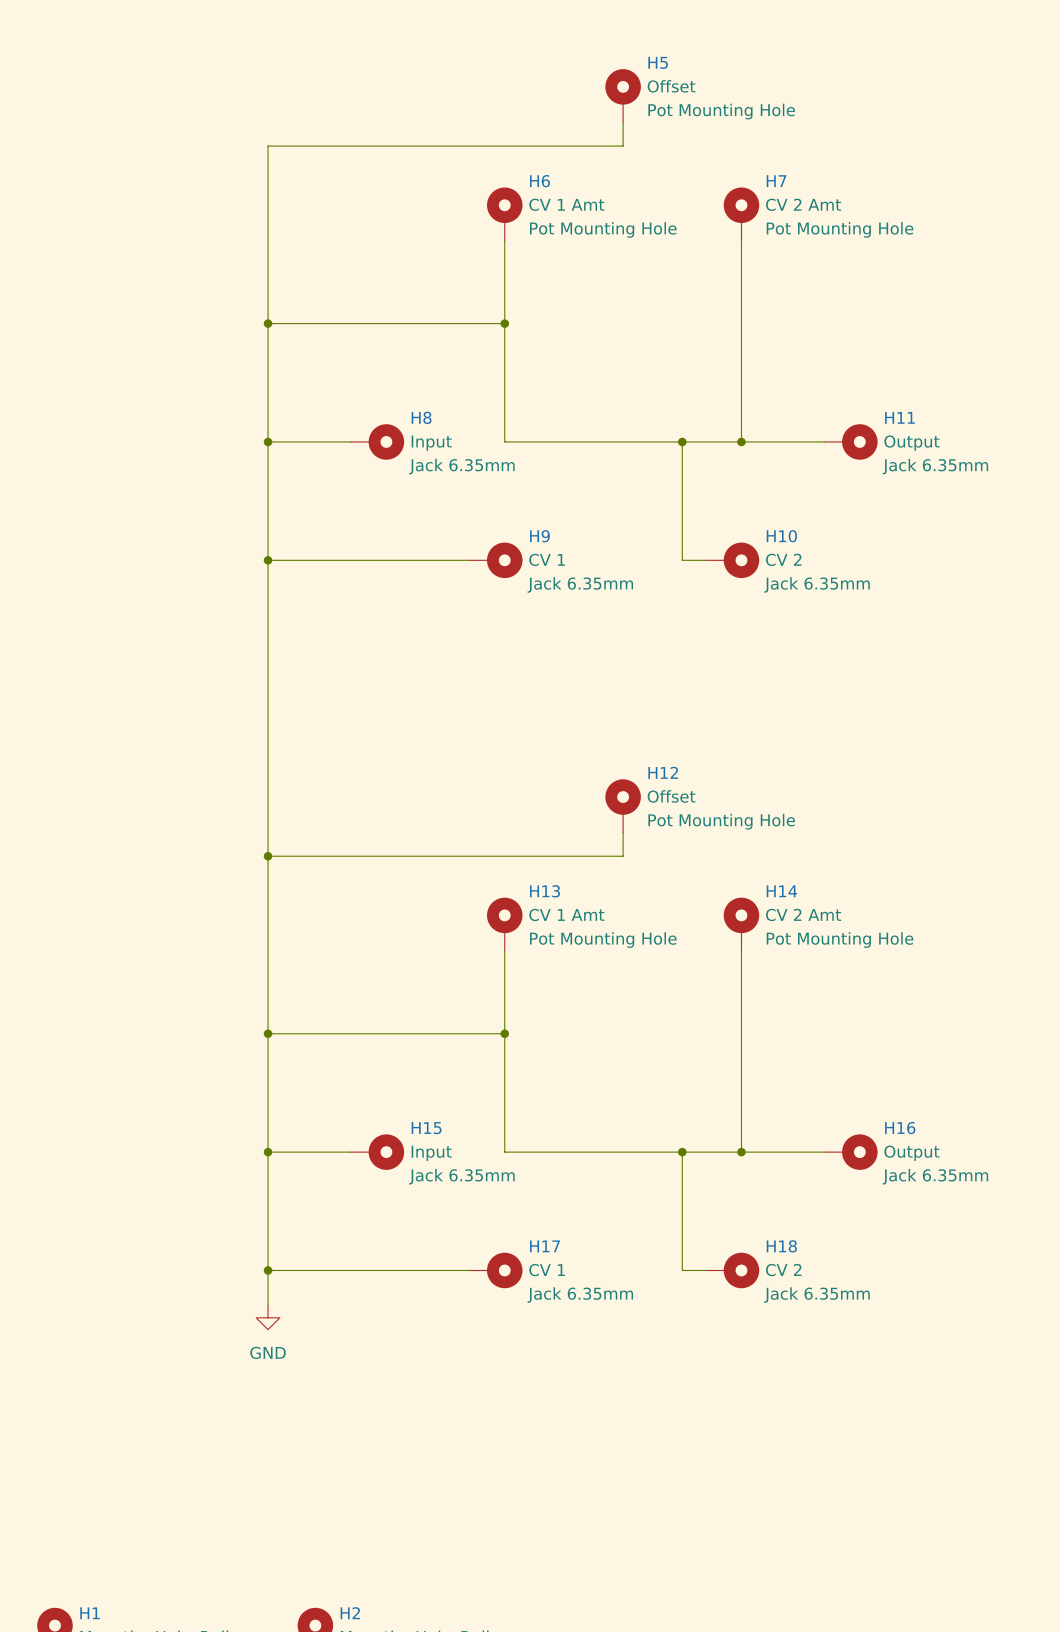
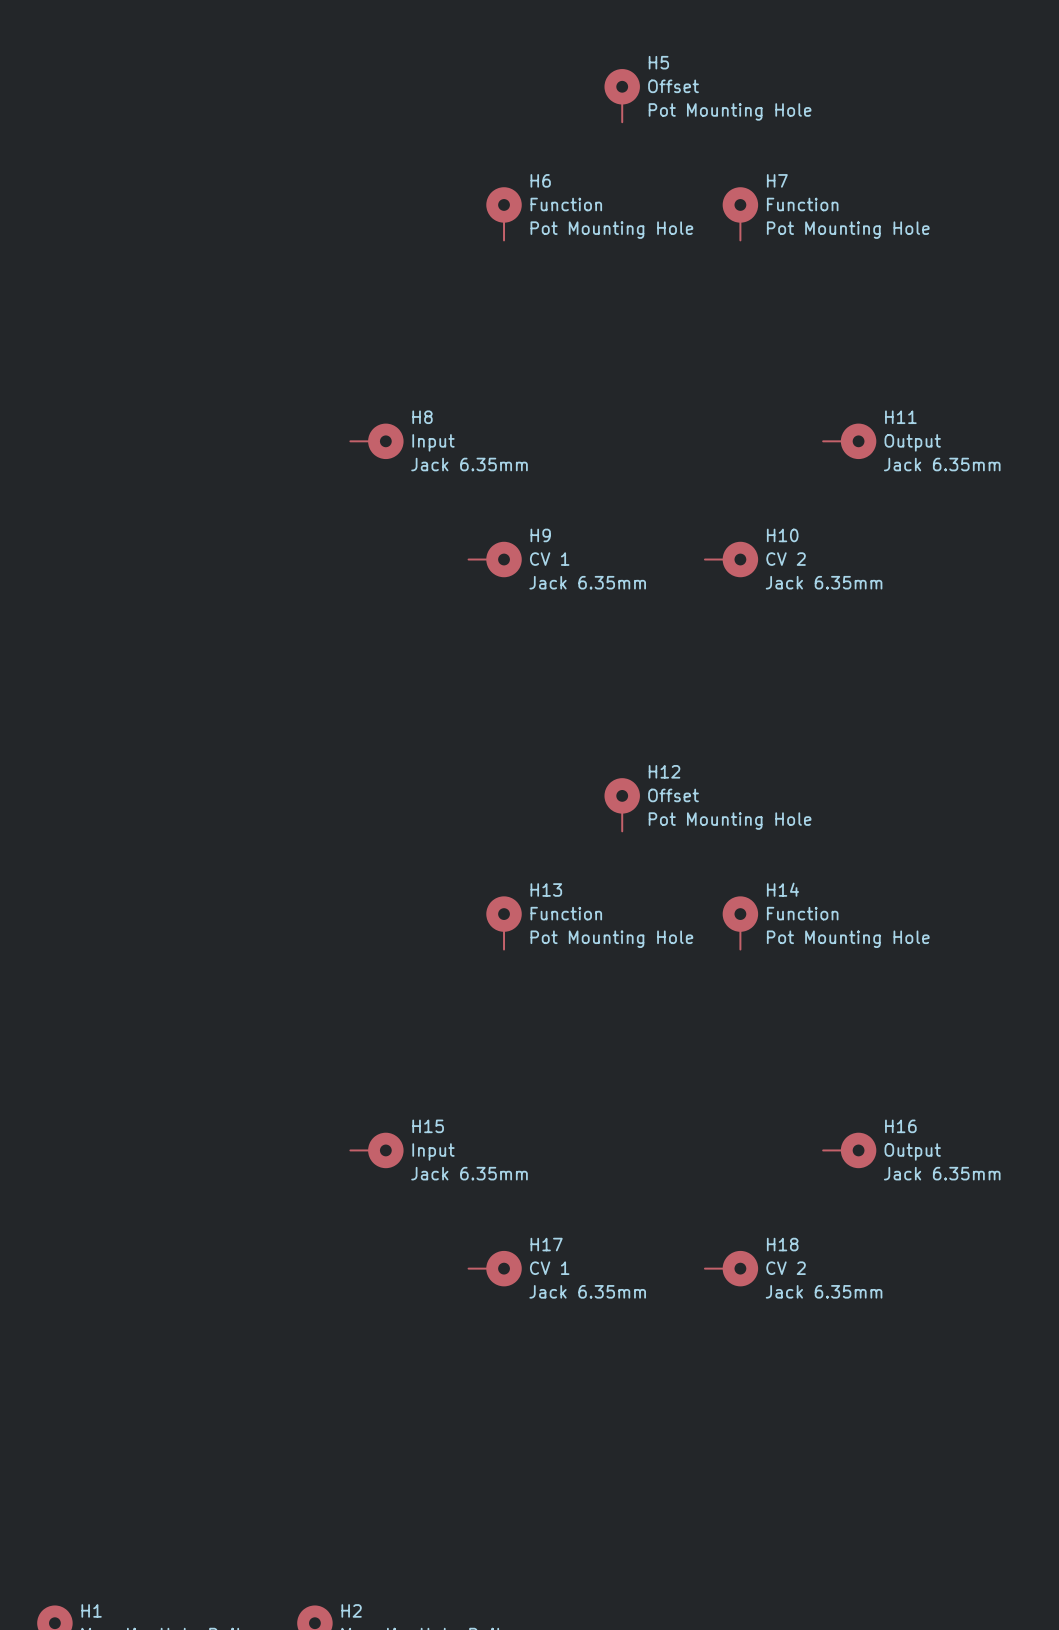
wire: (623, 122) (623, 146) (268, 146) (268, 1305) -> none
H6 value: CV 1 Amt (566, 204) -> Function (566, 204)
H7 value: CV 2 Amt (803, 204) -> Function (802, 204)
wire: (504, 240) (504, 441) (824, 441) -> none
wire: (741, 240) (741, 441) -> none
wire: (268, 323) (504, 323) -> none
junction: (268, 323) -> none
junction: (504, 323) -> none
wire: (268, 441) (350, 441) -> none
junction: (268, 441) -> none
wire: (682, 441) (682, 560) (705, 560) -> none
junction: (682, 441) -> none
junction: (741, 441) -> none
wire: (268, 560) (469, 560) -> none
junction: (268, 560) -> none
wire: (623, 832) (623, 856) (268, 856) -> none
junction: (268, 856) -> none
H13 value: CV 1 Amt (566, 914) -> Function (566, 913)
H14 value: CV 2 Amt (803, 914) -> Function (802, 913)
wire: (504, 950) (504, 1152) (824, 1152) -> none
wire: (741, 950) (741, 1152) -> none
wire: (268, 1033) (504, 1033) -> none
junction: (268, 1033) -> none
junction: (504, 1033) -> none
wire: (268, 1152) (350, 1152) -> none
junction: (268, 1152) -> none
wire: (682, 1152) (682, 1270) (705, 1270) -> none
junction: (682, 1152) -> none
junction: (741, 1152) -> none
wire: (268, 1270) (469, 1270) -> none
junction: (268, 1270) -> none
power symbol: GND (268, 1317) -> none

